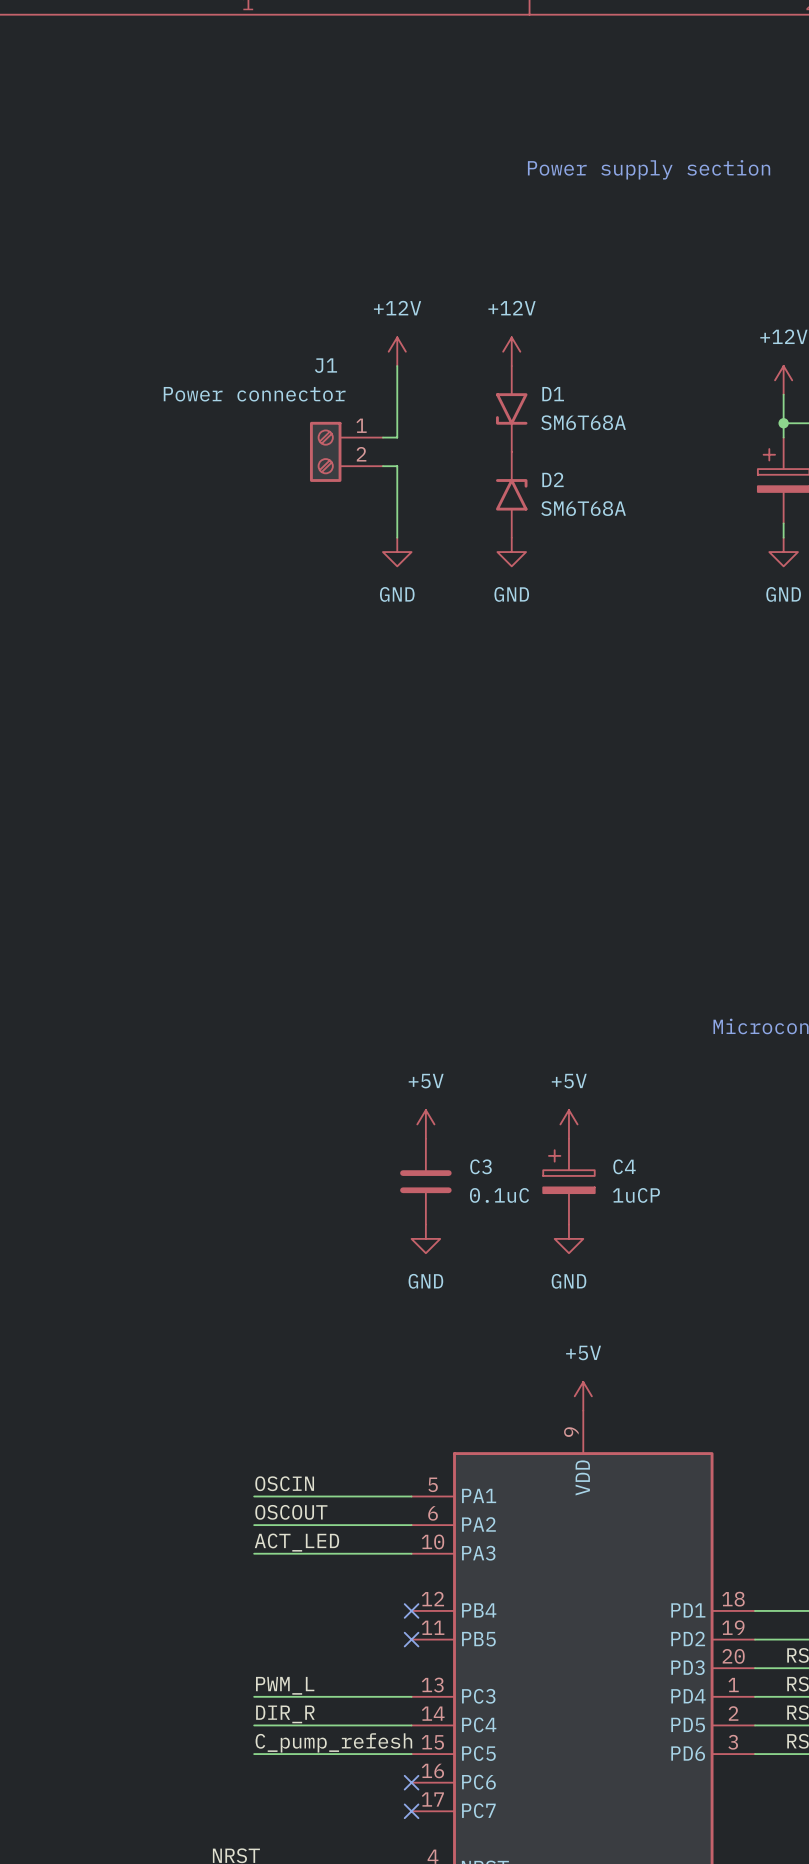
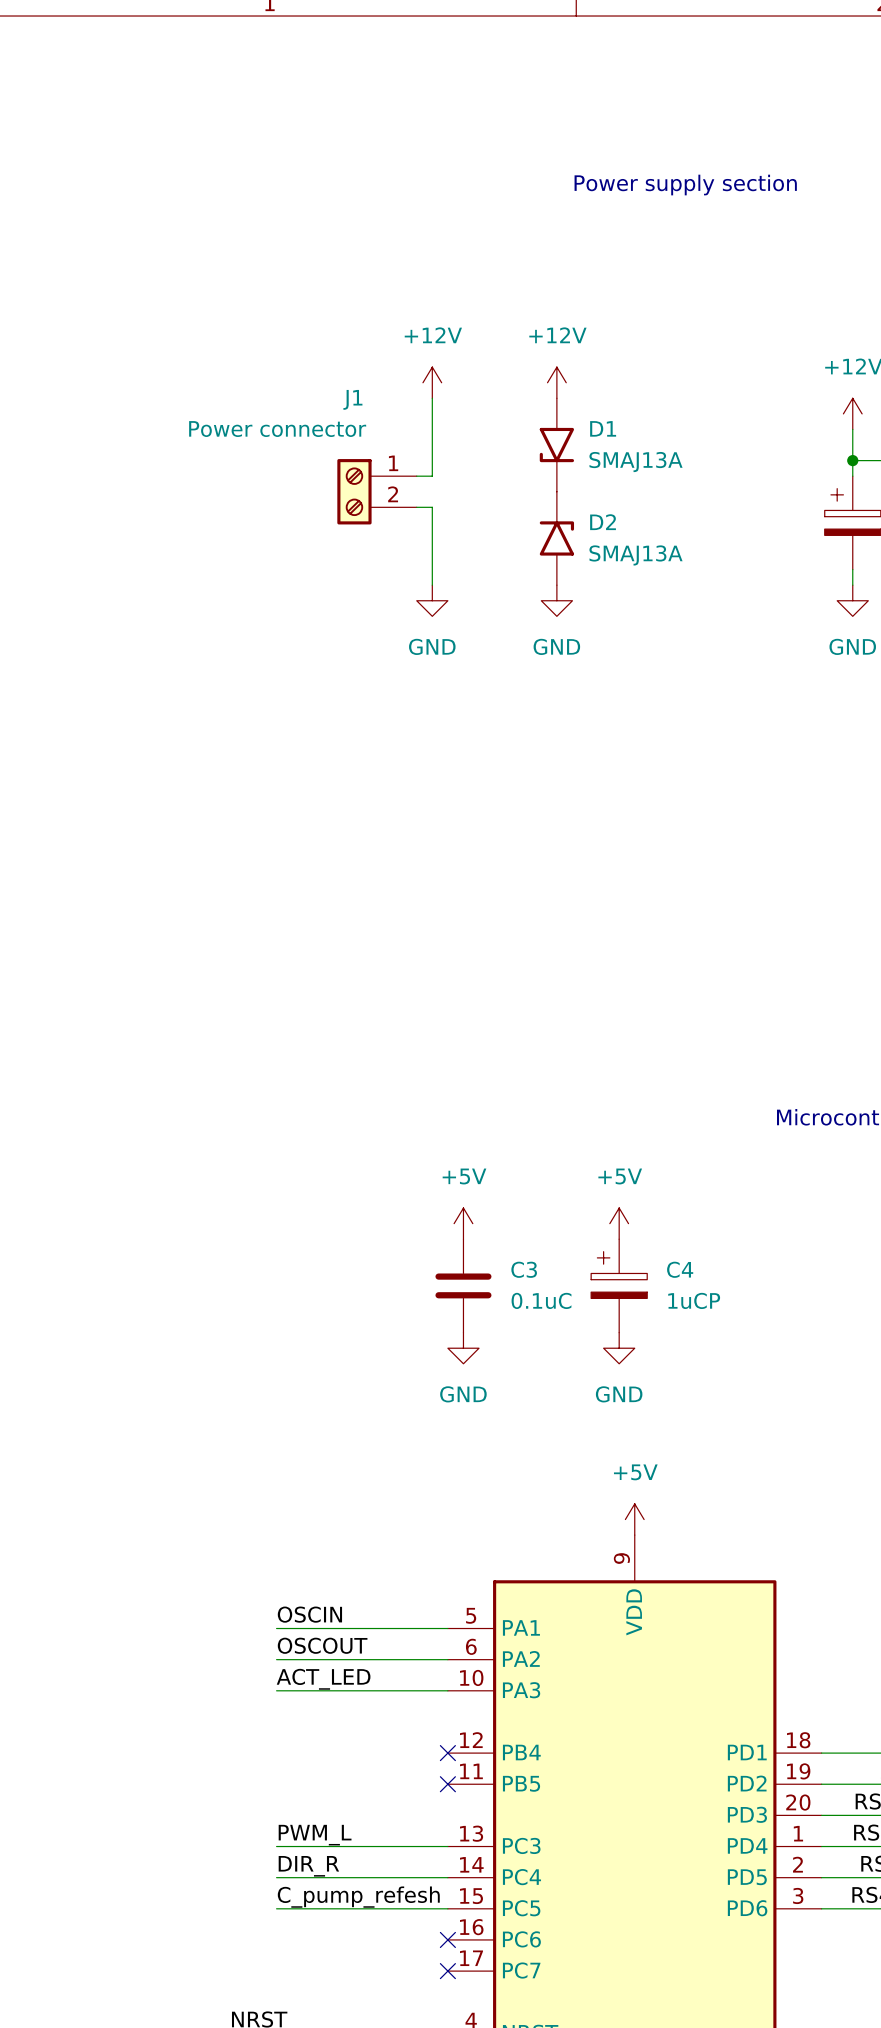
D1 value: SM6T68A (583, 422) -> SMAJ13A (635, 462)
D2 value: SM6T68A (583, 508) -> SMAJ13A (635, 555)

